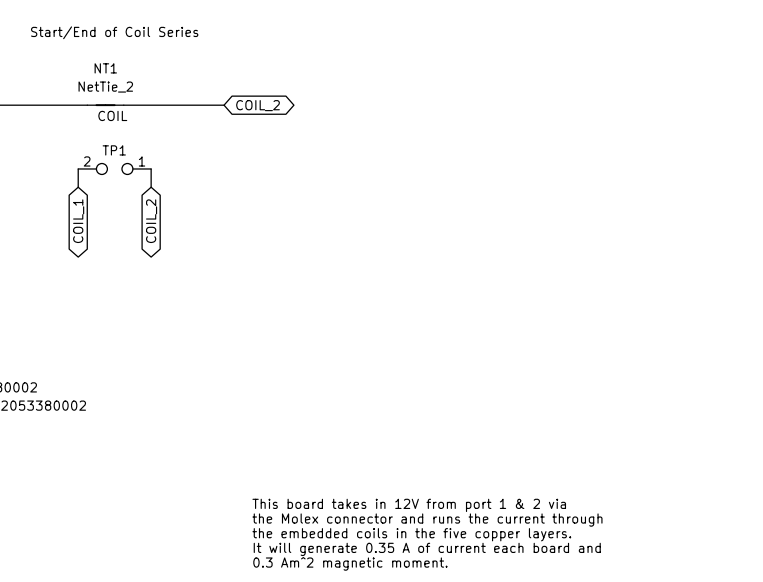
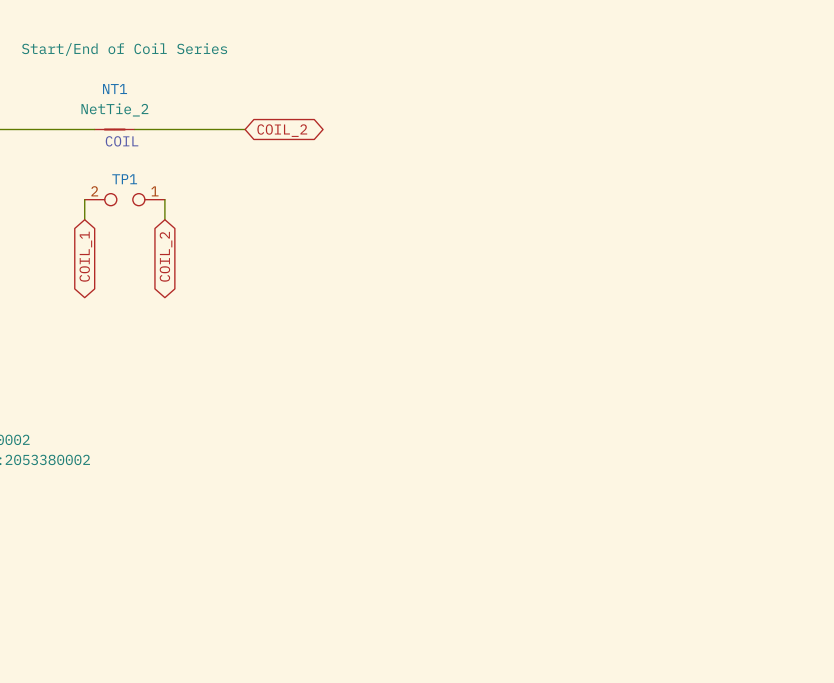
text: This board takes in 12V from port 1 & 2 via (409, 505) -> none
text: the Molex connector and runs the current through (427, 520) -> none
text: the embedded coils in the five copper layers. (411, 534) -> none
text: It will generate 0.35 A of current each board and (427, 549) -> none
text: 0.3 Am^2 magnetic moment. (350, 563) -> none

